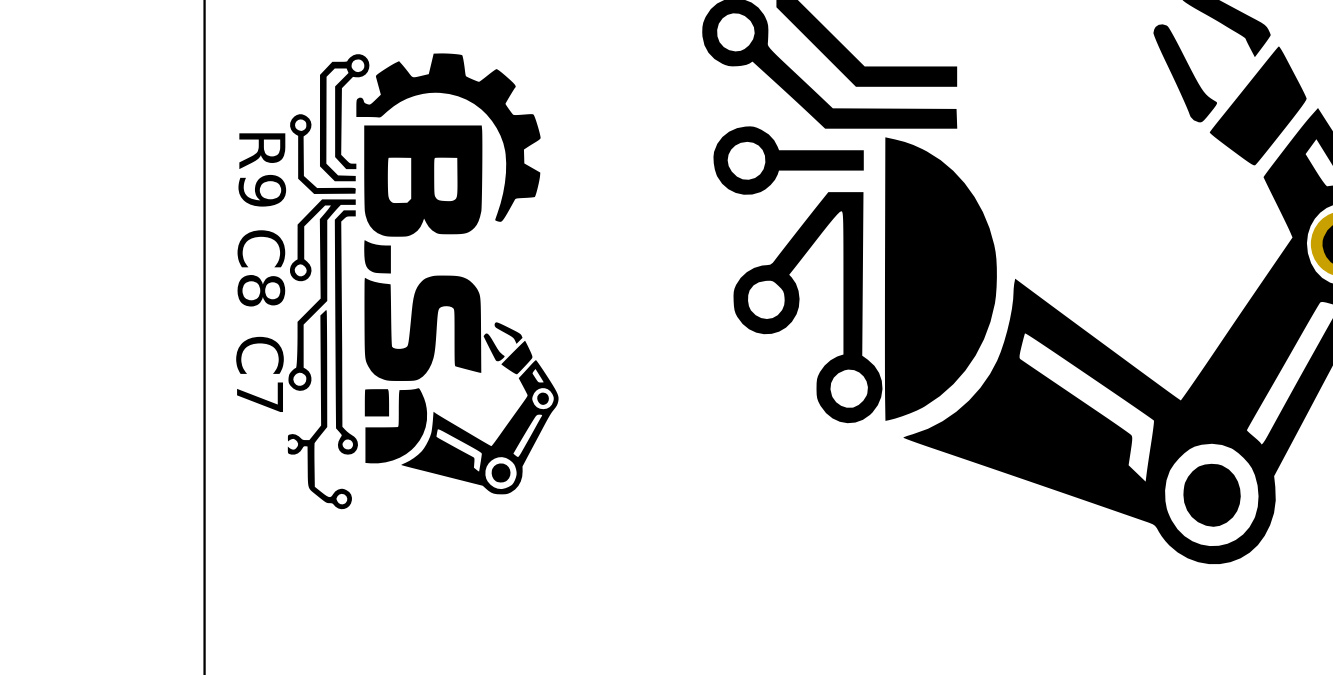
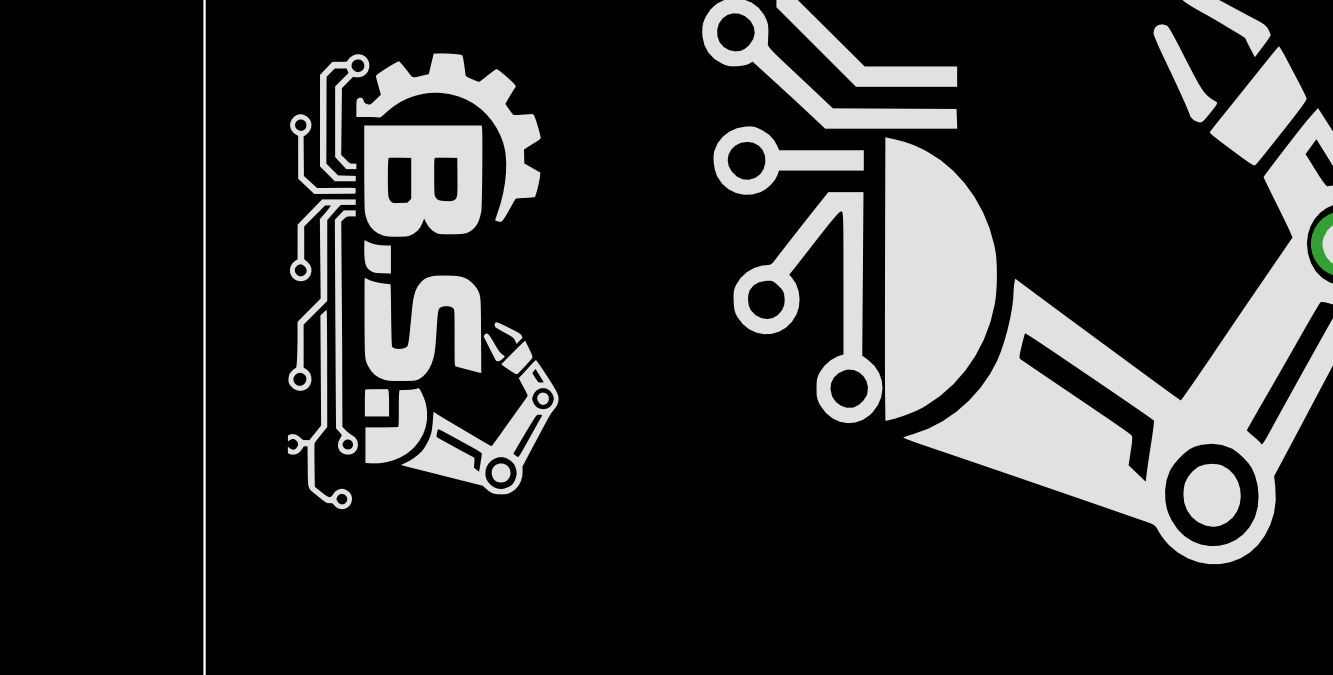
R9: (262, 169) -> none
C8: (261, 268) -> none
C7: (260, 374) -> none

